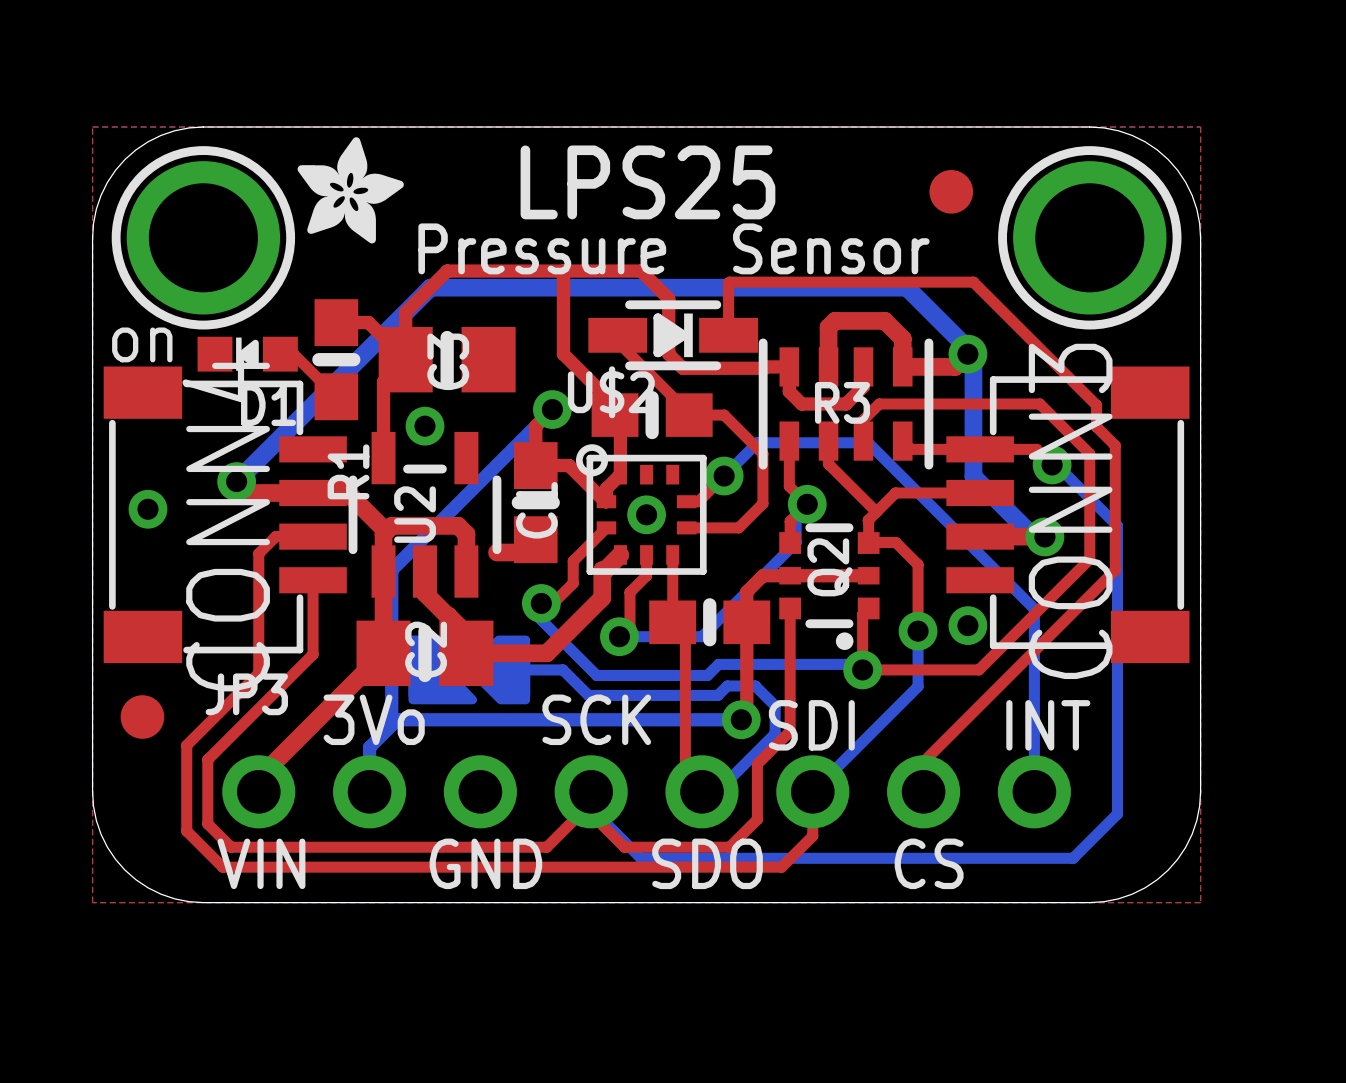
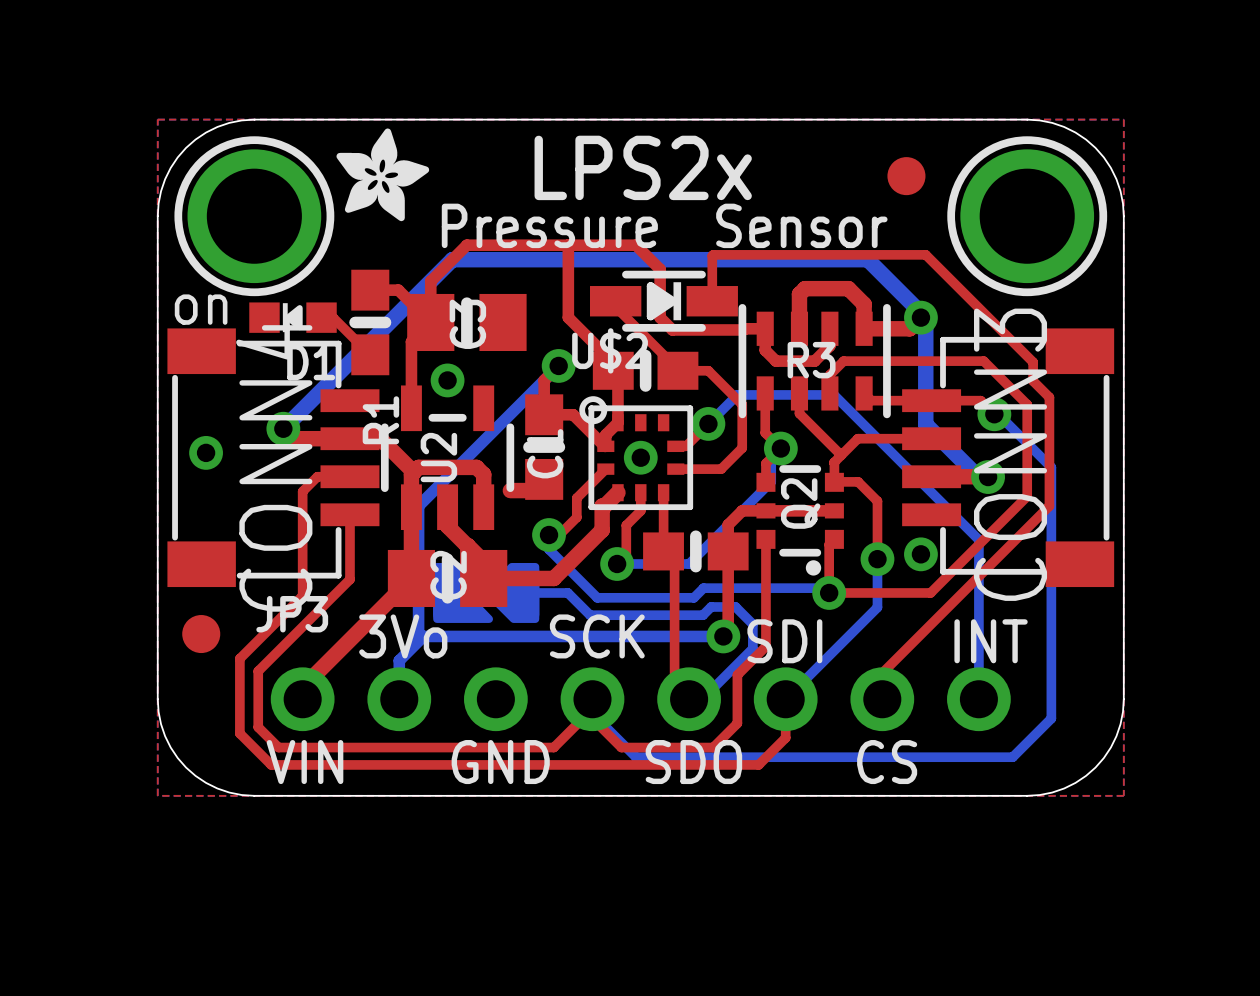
text: LPS25 (647, 182) -> LPS2x (643, 167)

